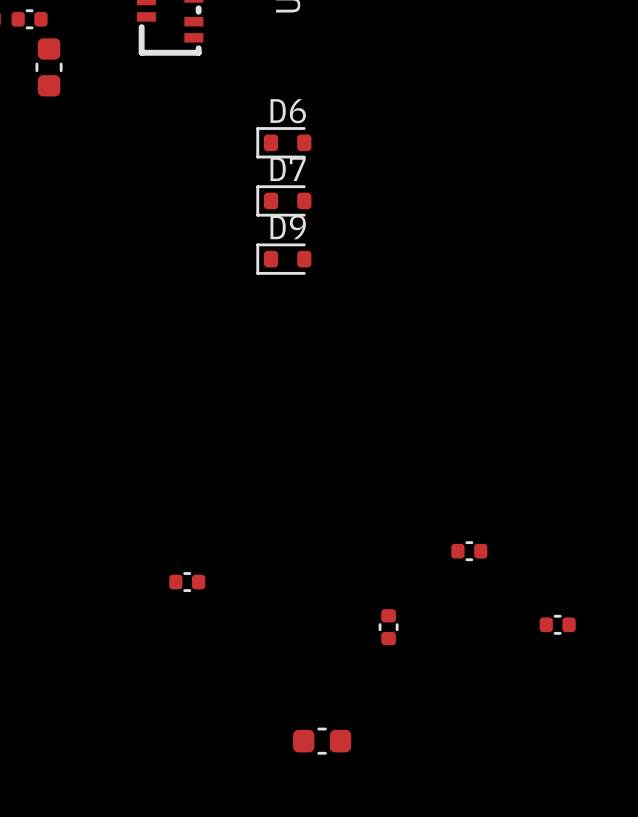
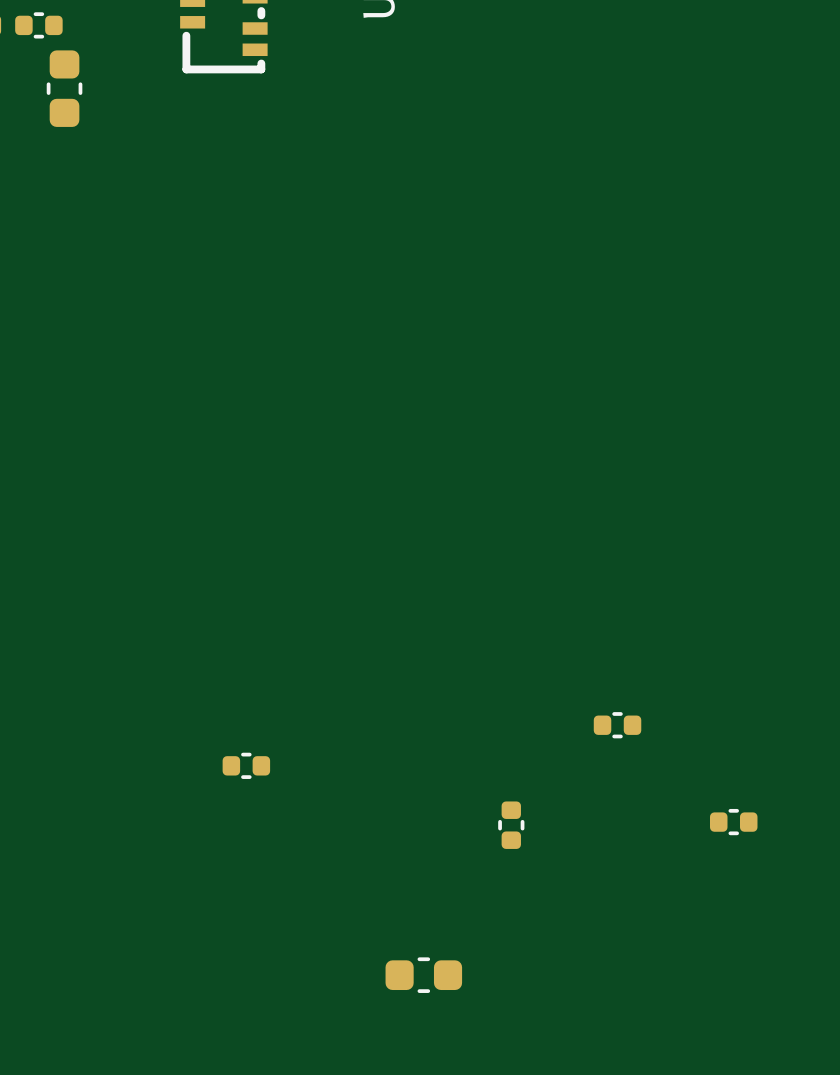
D6: (283, 142) -> none
D7: (283, 200) -> none
D9: (283, 259) -> none

